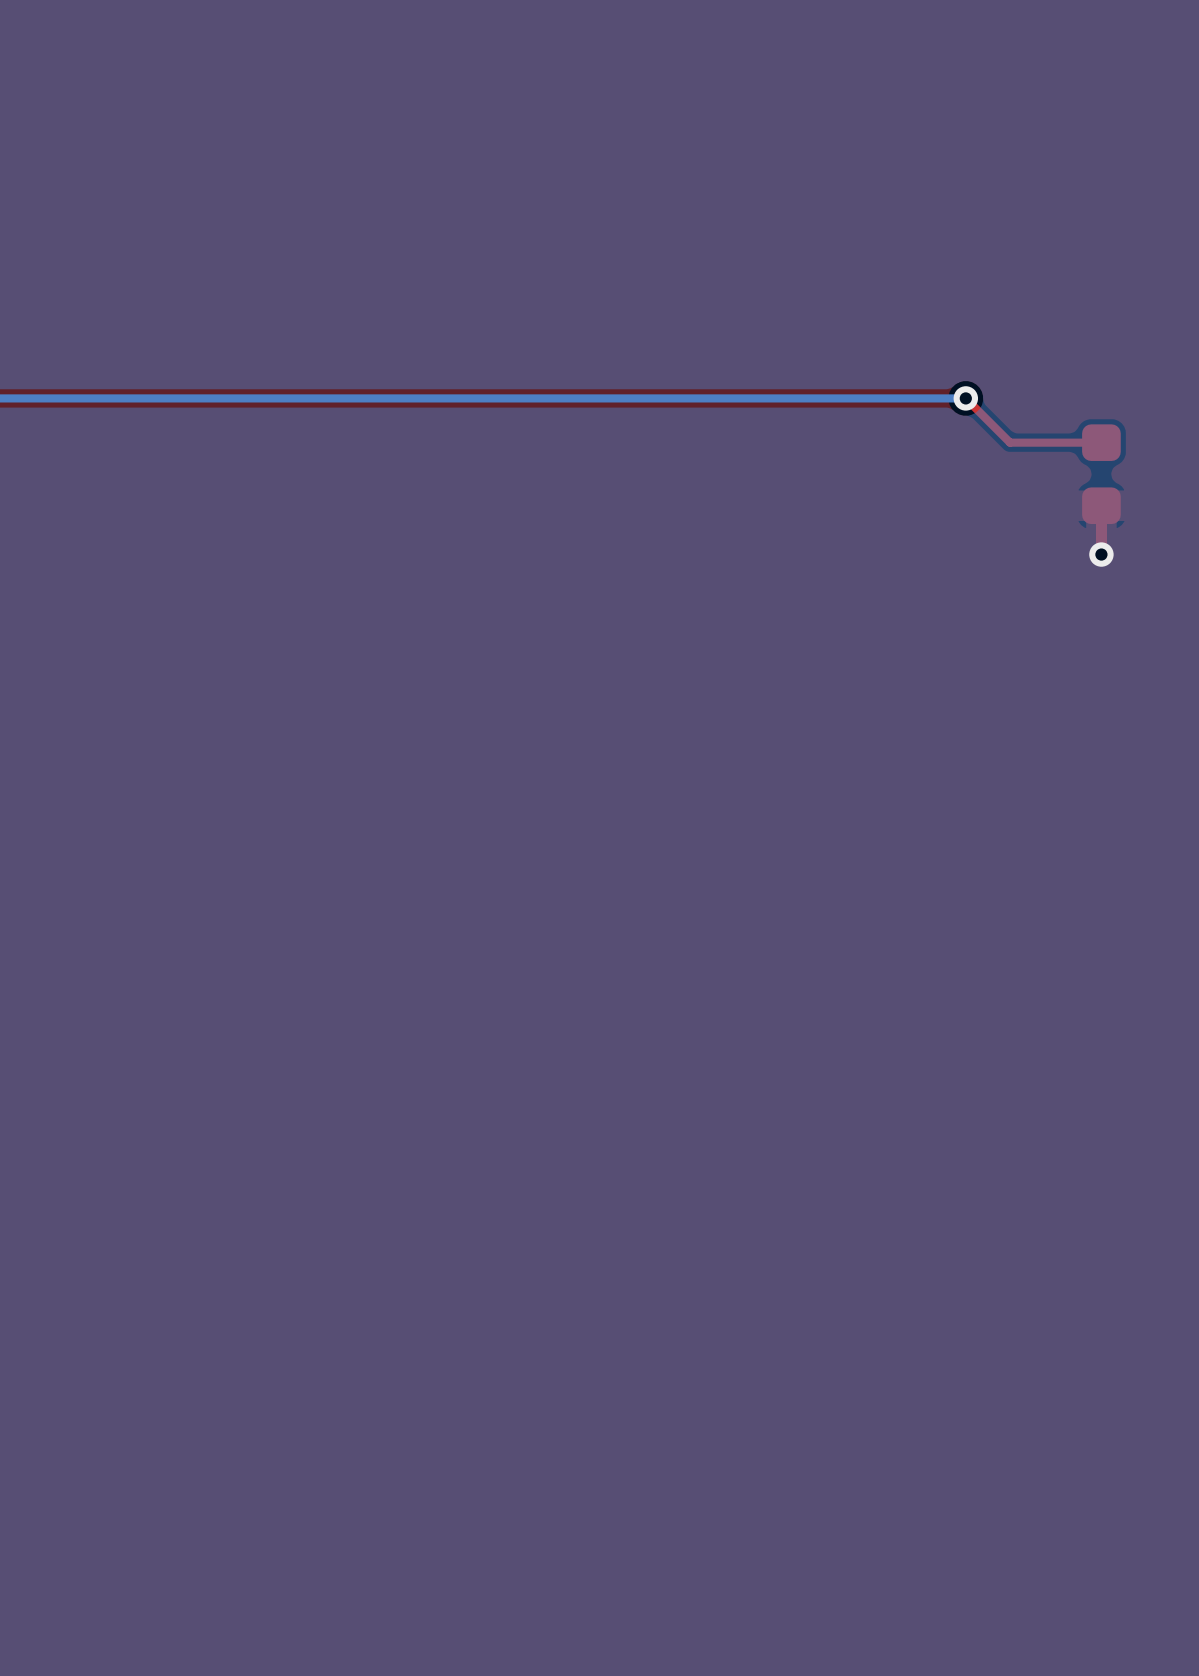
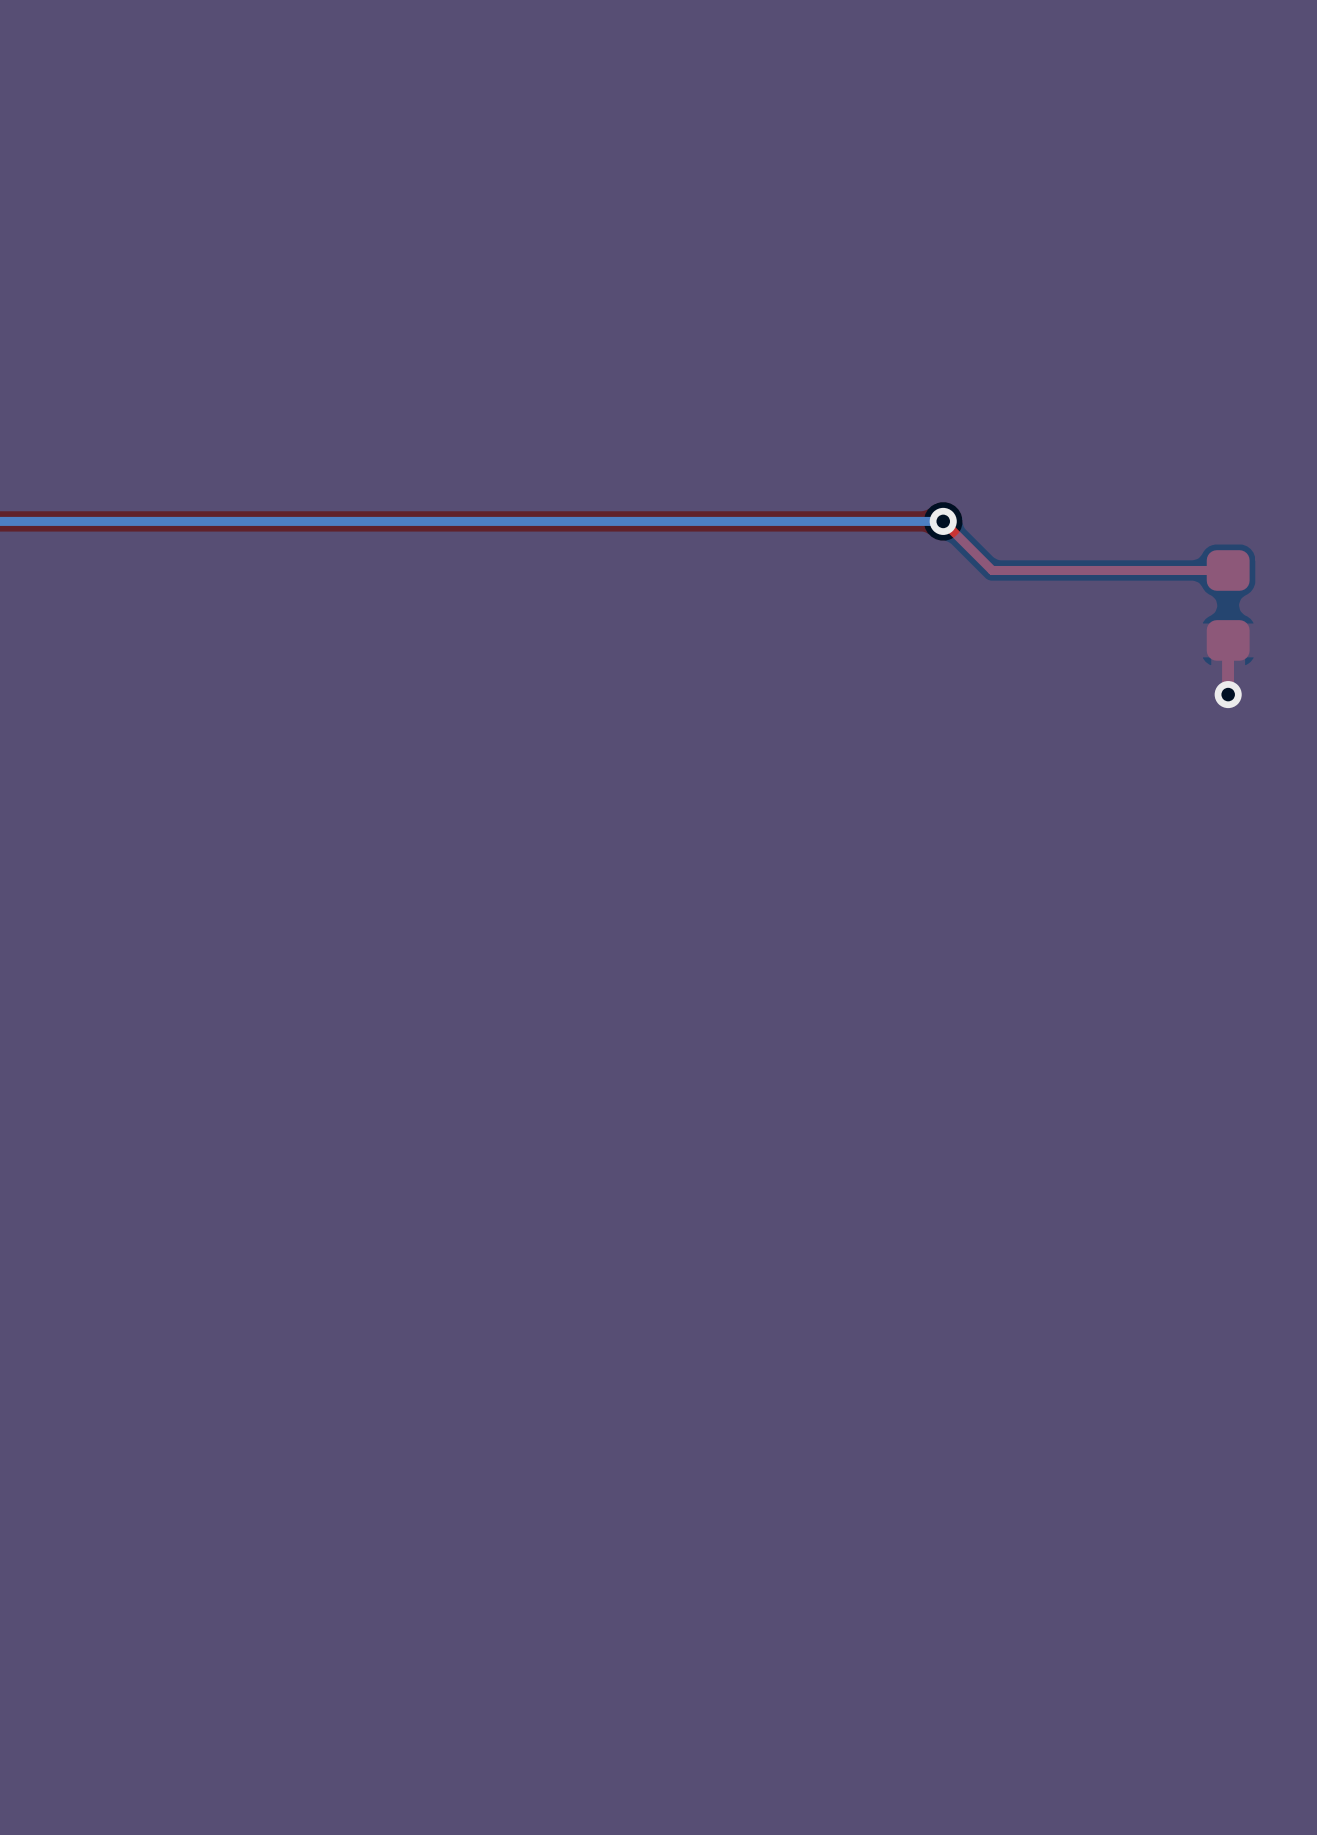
top track: (965, 398) (1010, 442) -> (943, 521) (992, 570) (1126, 570)
bottom track: (965, 398) (844, 398) -> none
via position: (965, 398) -> (943, 521)

